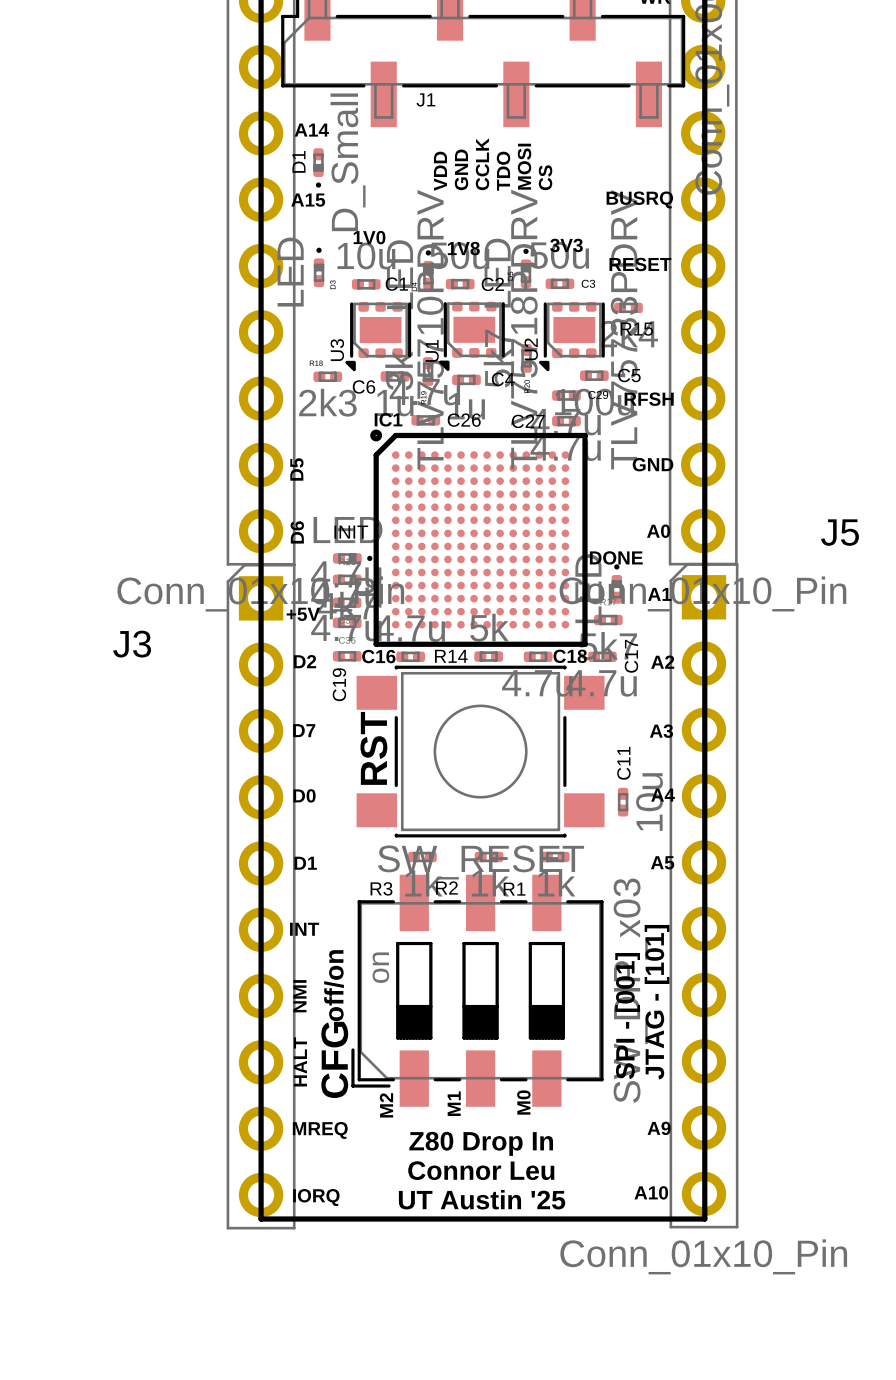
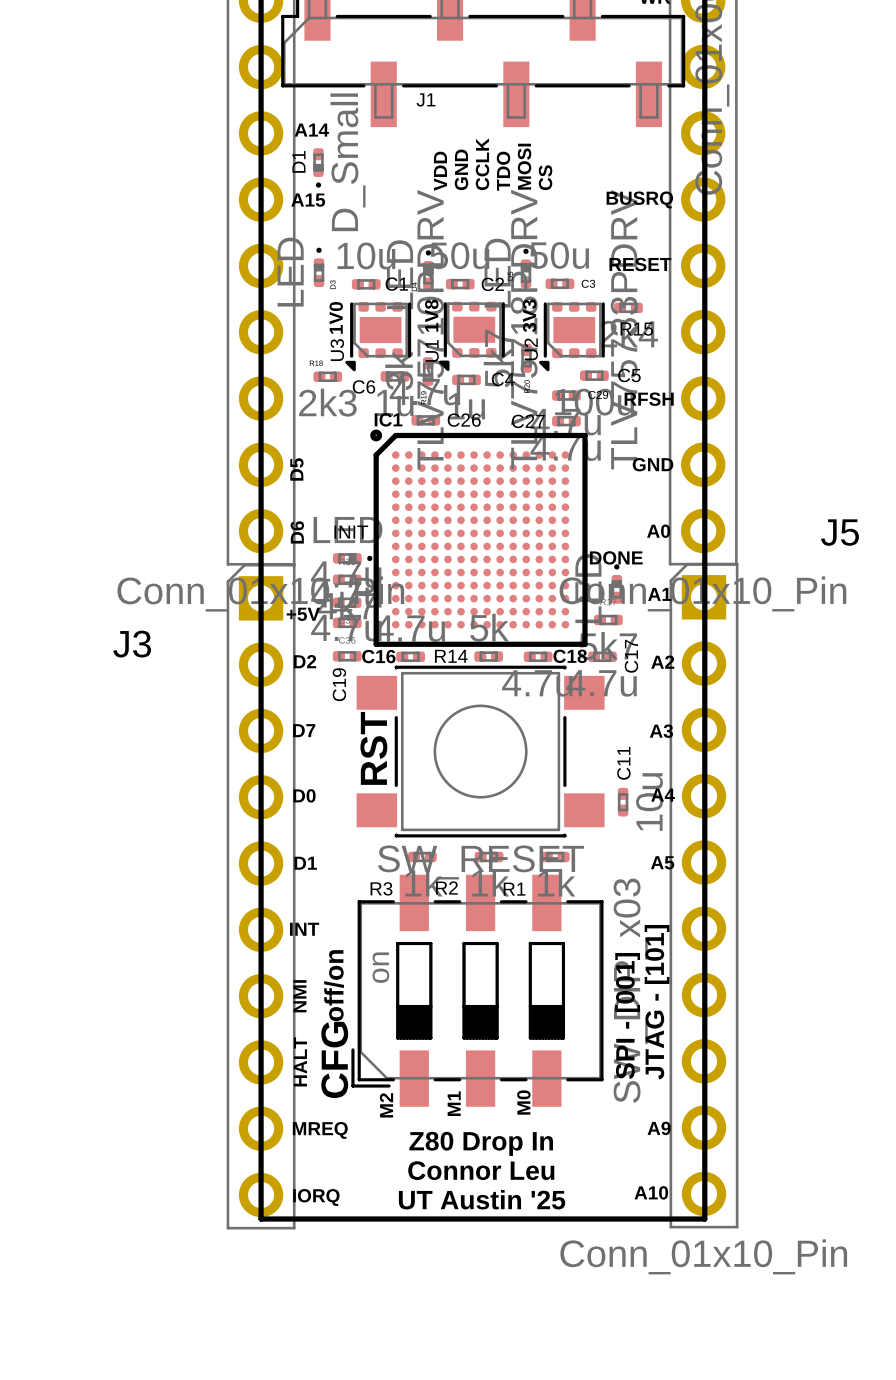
text rotation: 0° (369, 237) -> 90° counterclockwise (336, 317)
text position: 1V0 (369, 237) -> 1V0 (336, 317)
text rotation: 0° (566, 245) -> 90° counterclockwise (529, 315)
text position: 3V3 (566, 245) -> 3V3 (529, 315)
text rotation: 0° (463, 248) -> 90° counterclockwise (431, 315)
text position: 1V8 (463, 248) -> 1V8 (431, 315)

